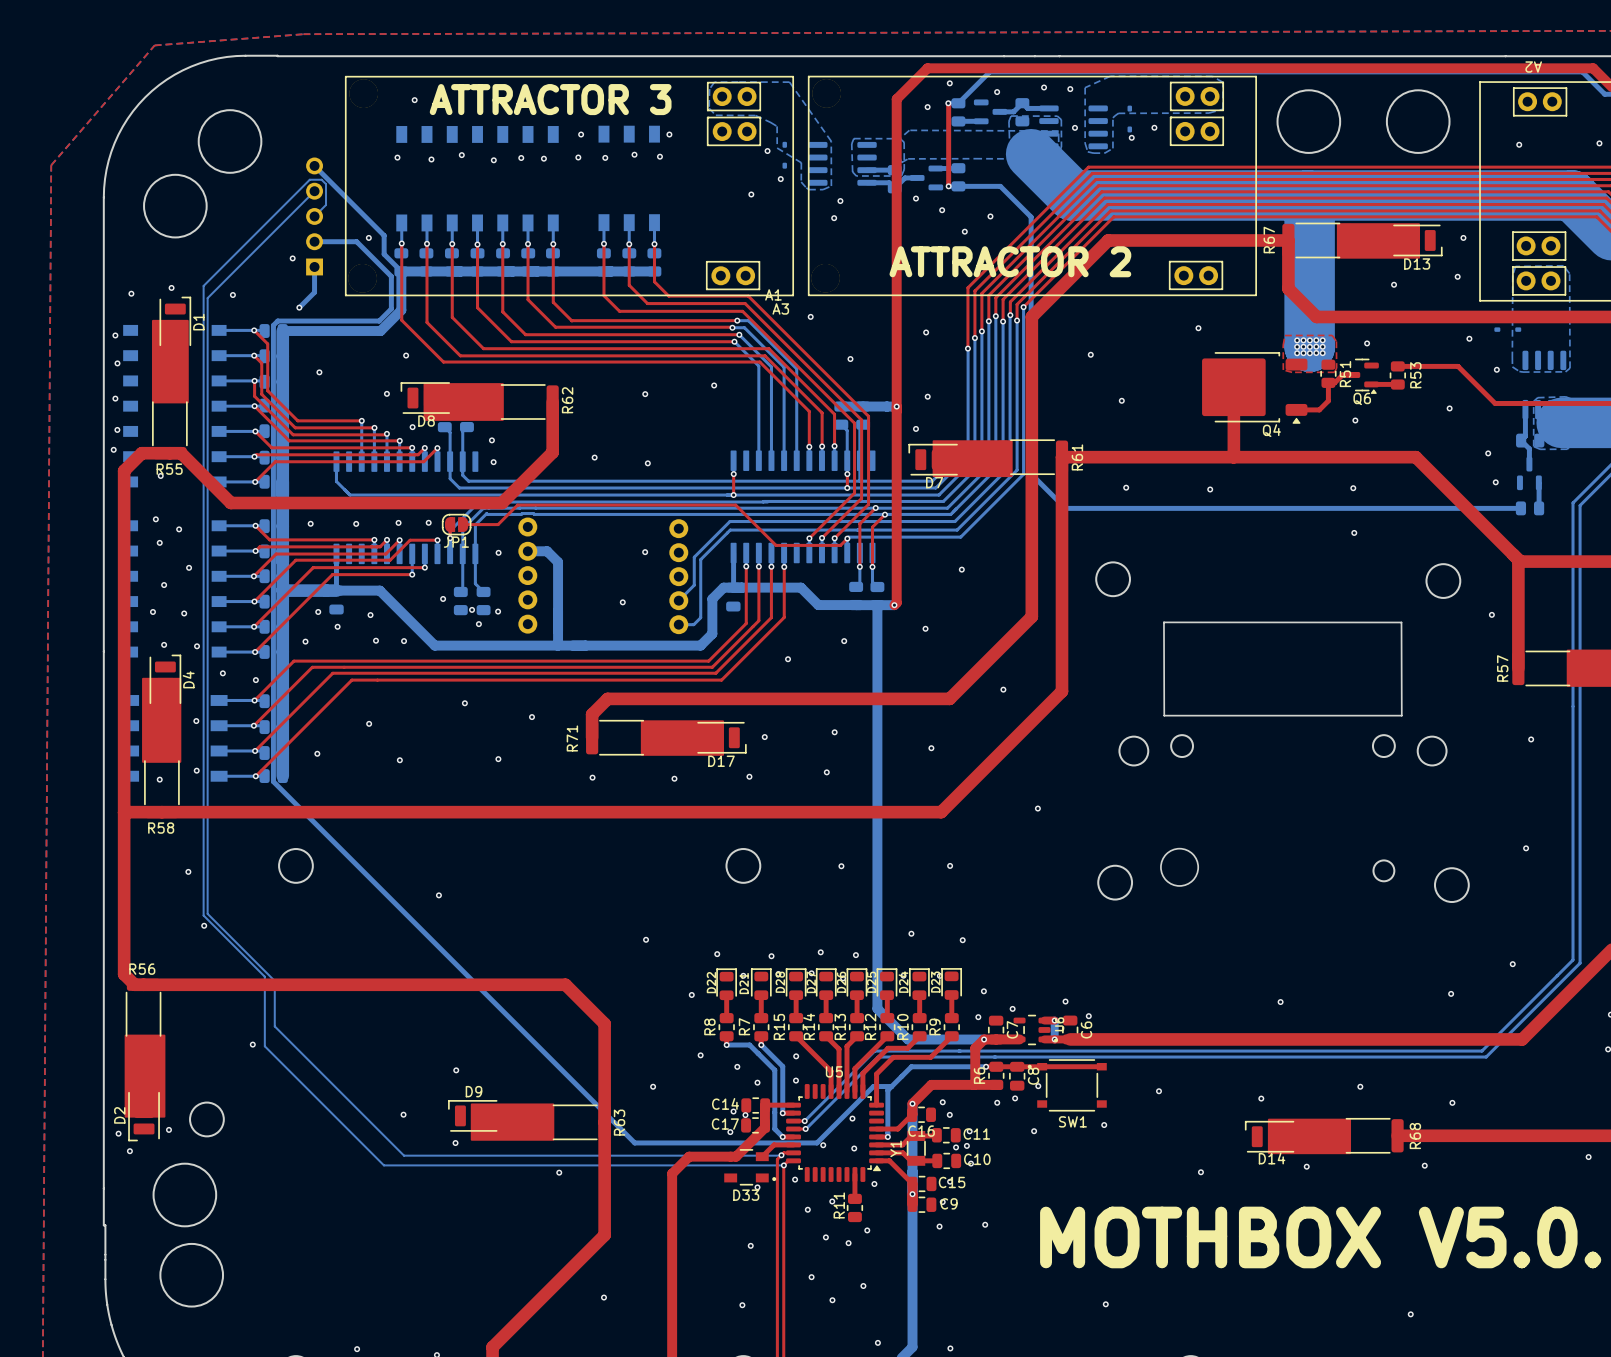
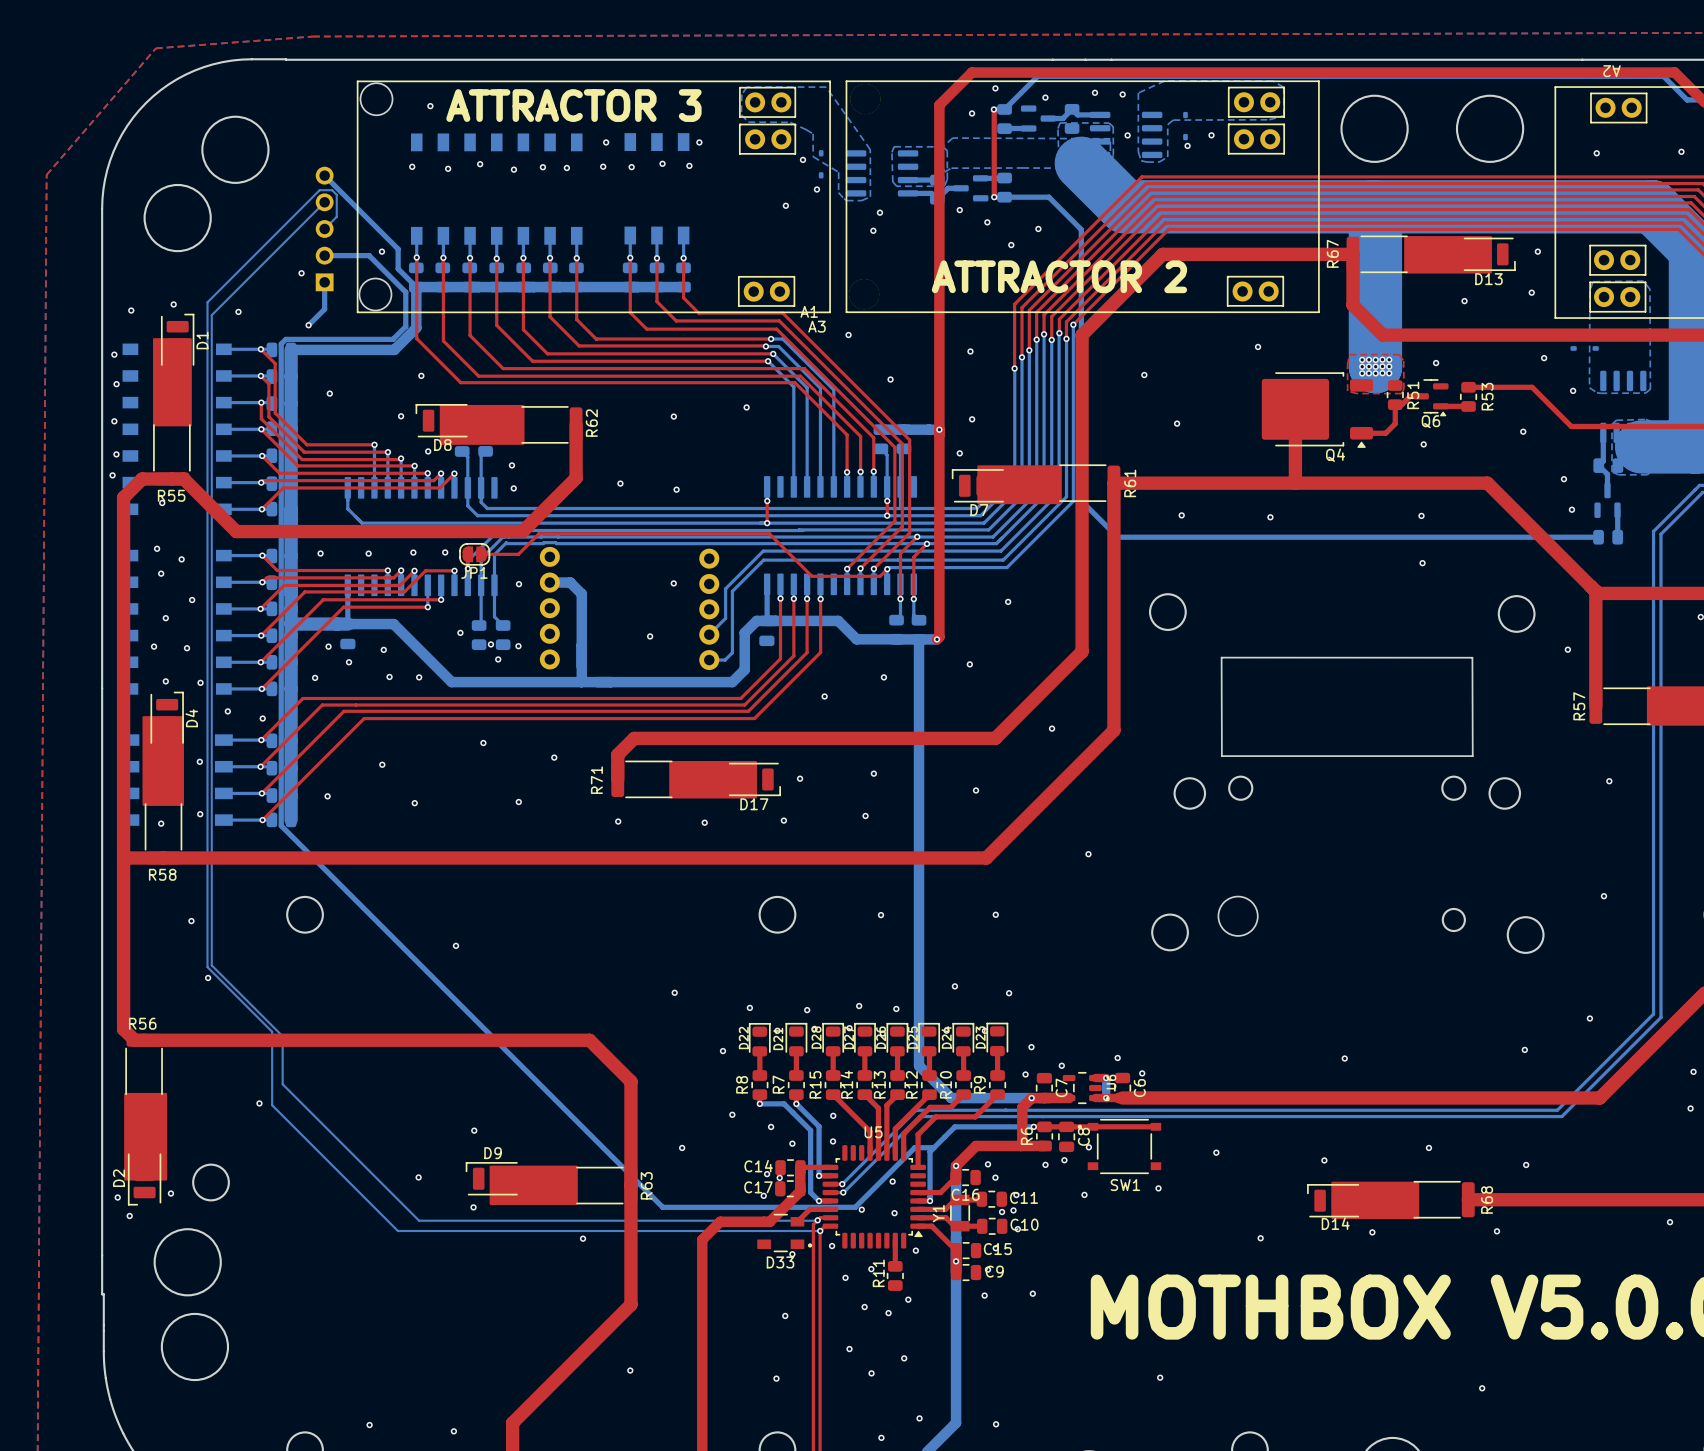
A3 footprint: [345, 76, 794, 296] -> [357, 80, 831, 313]

